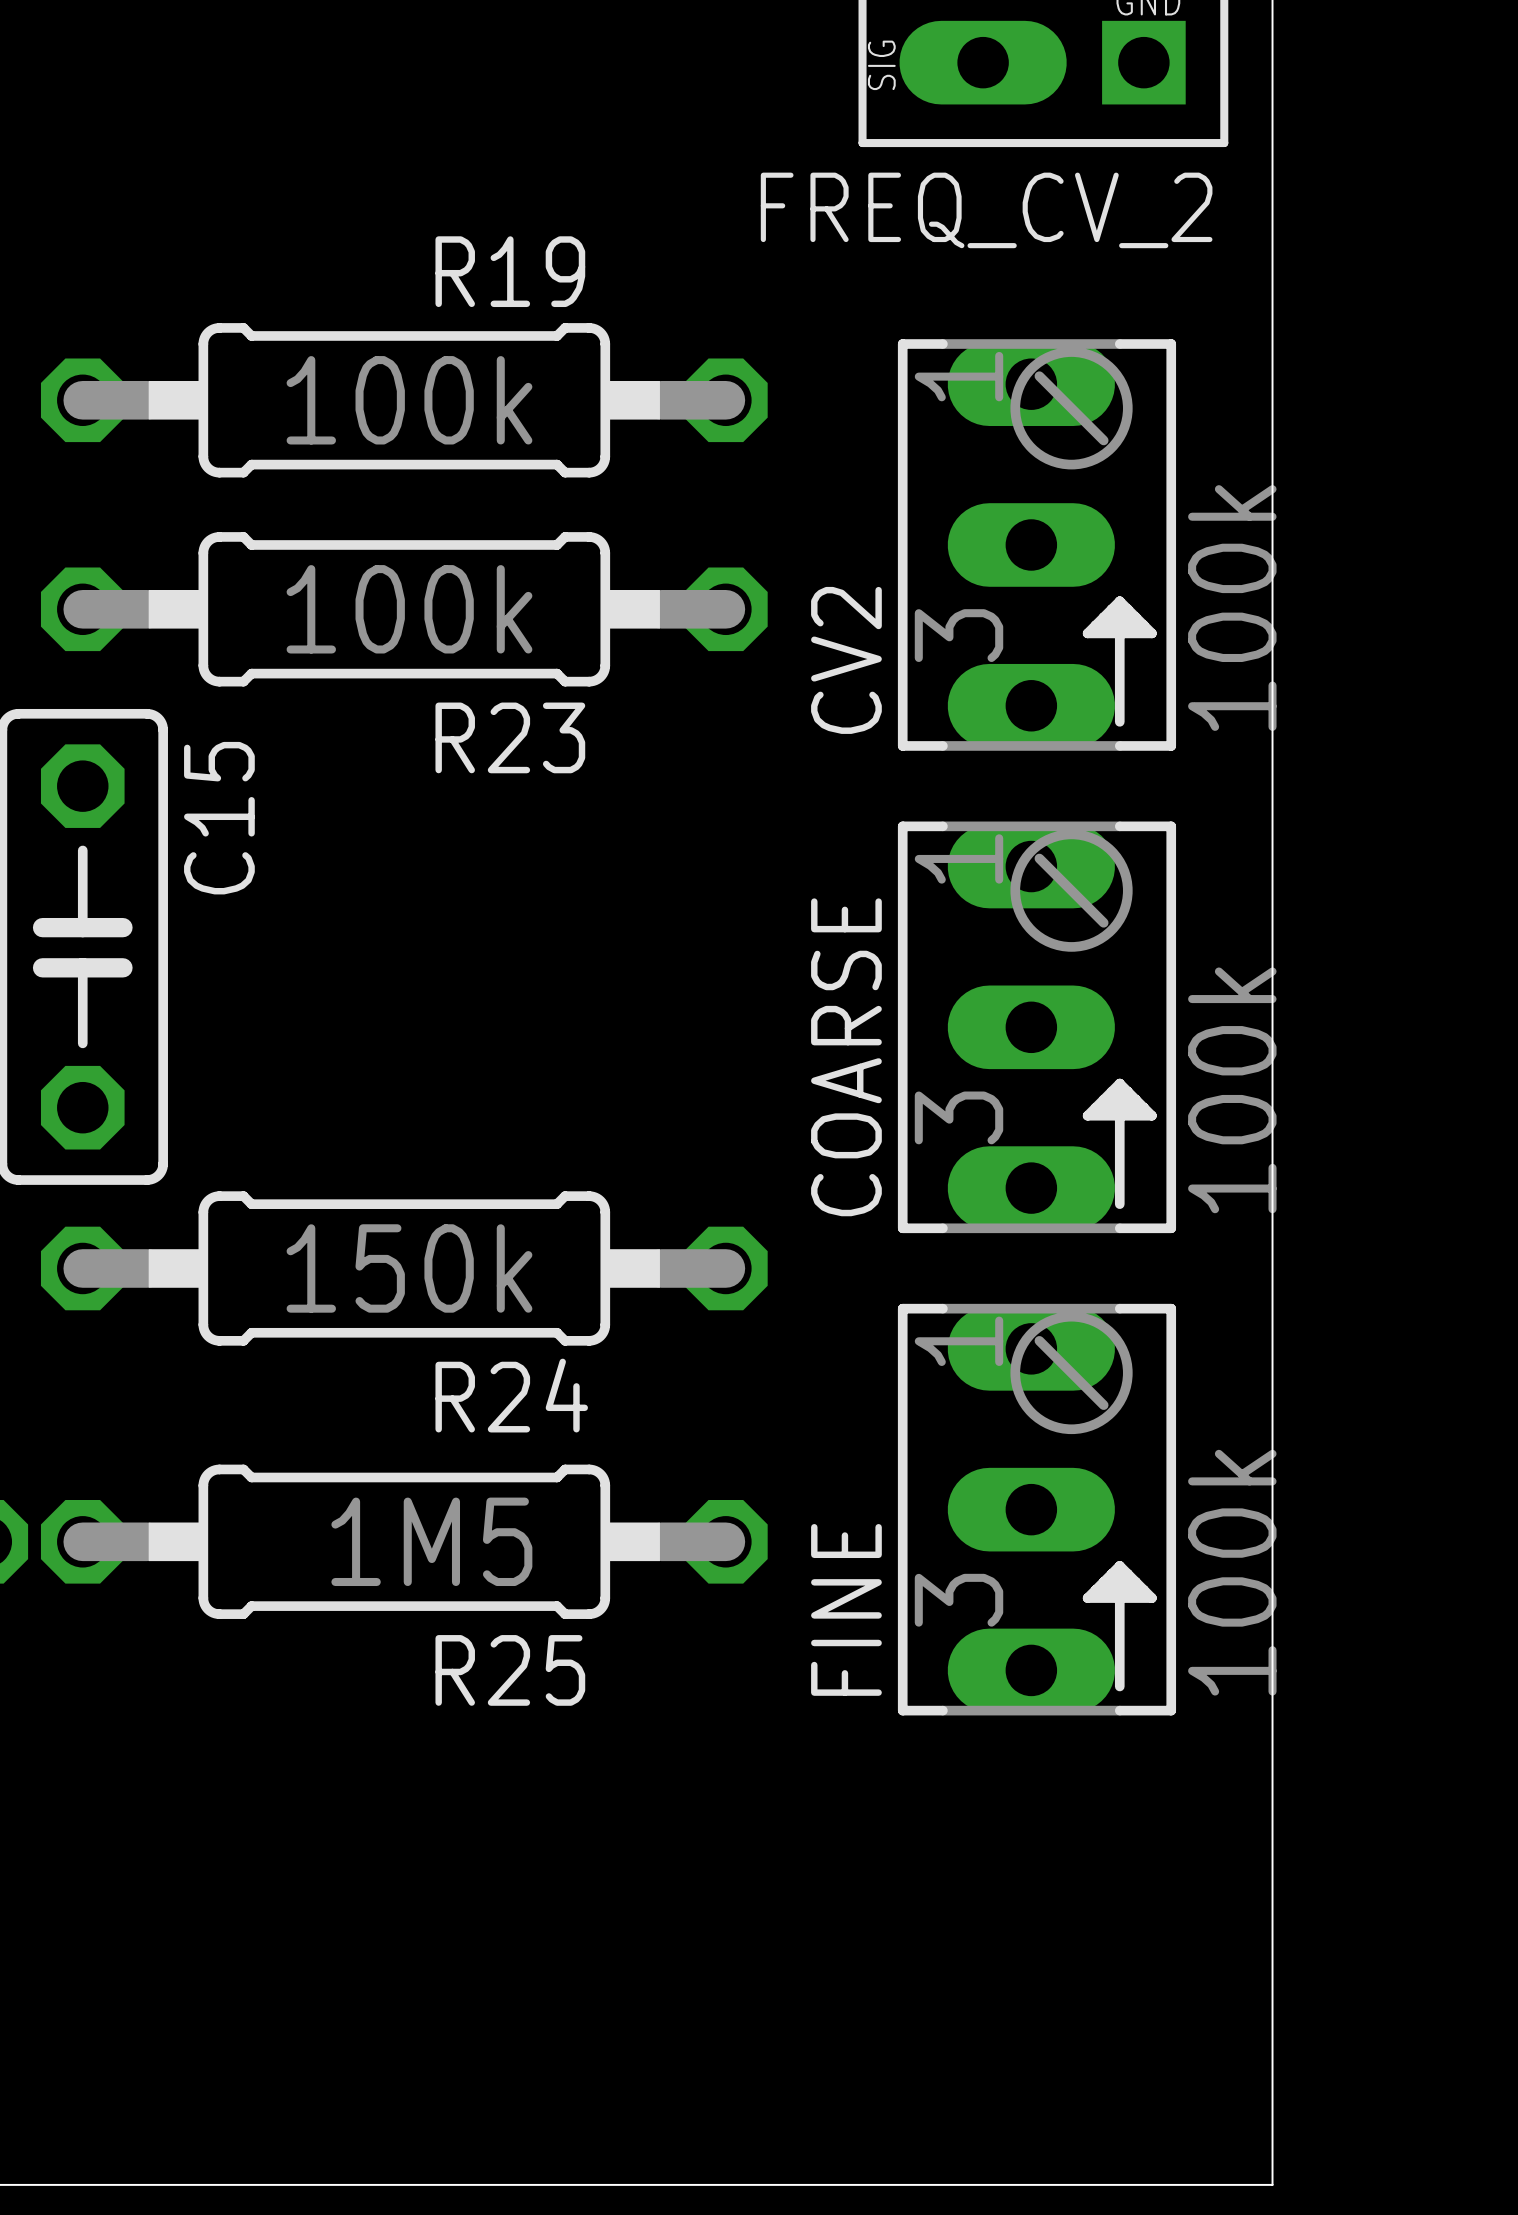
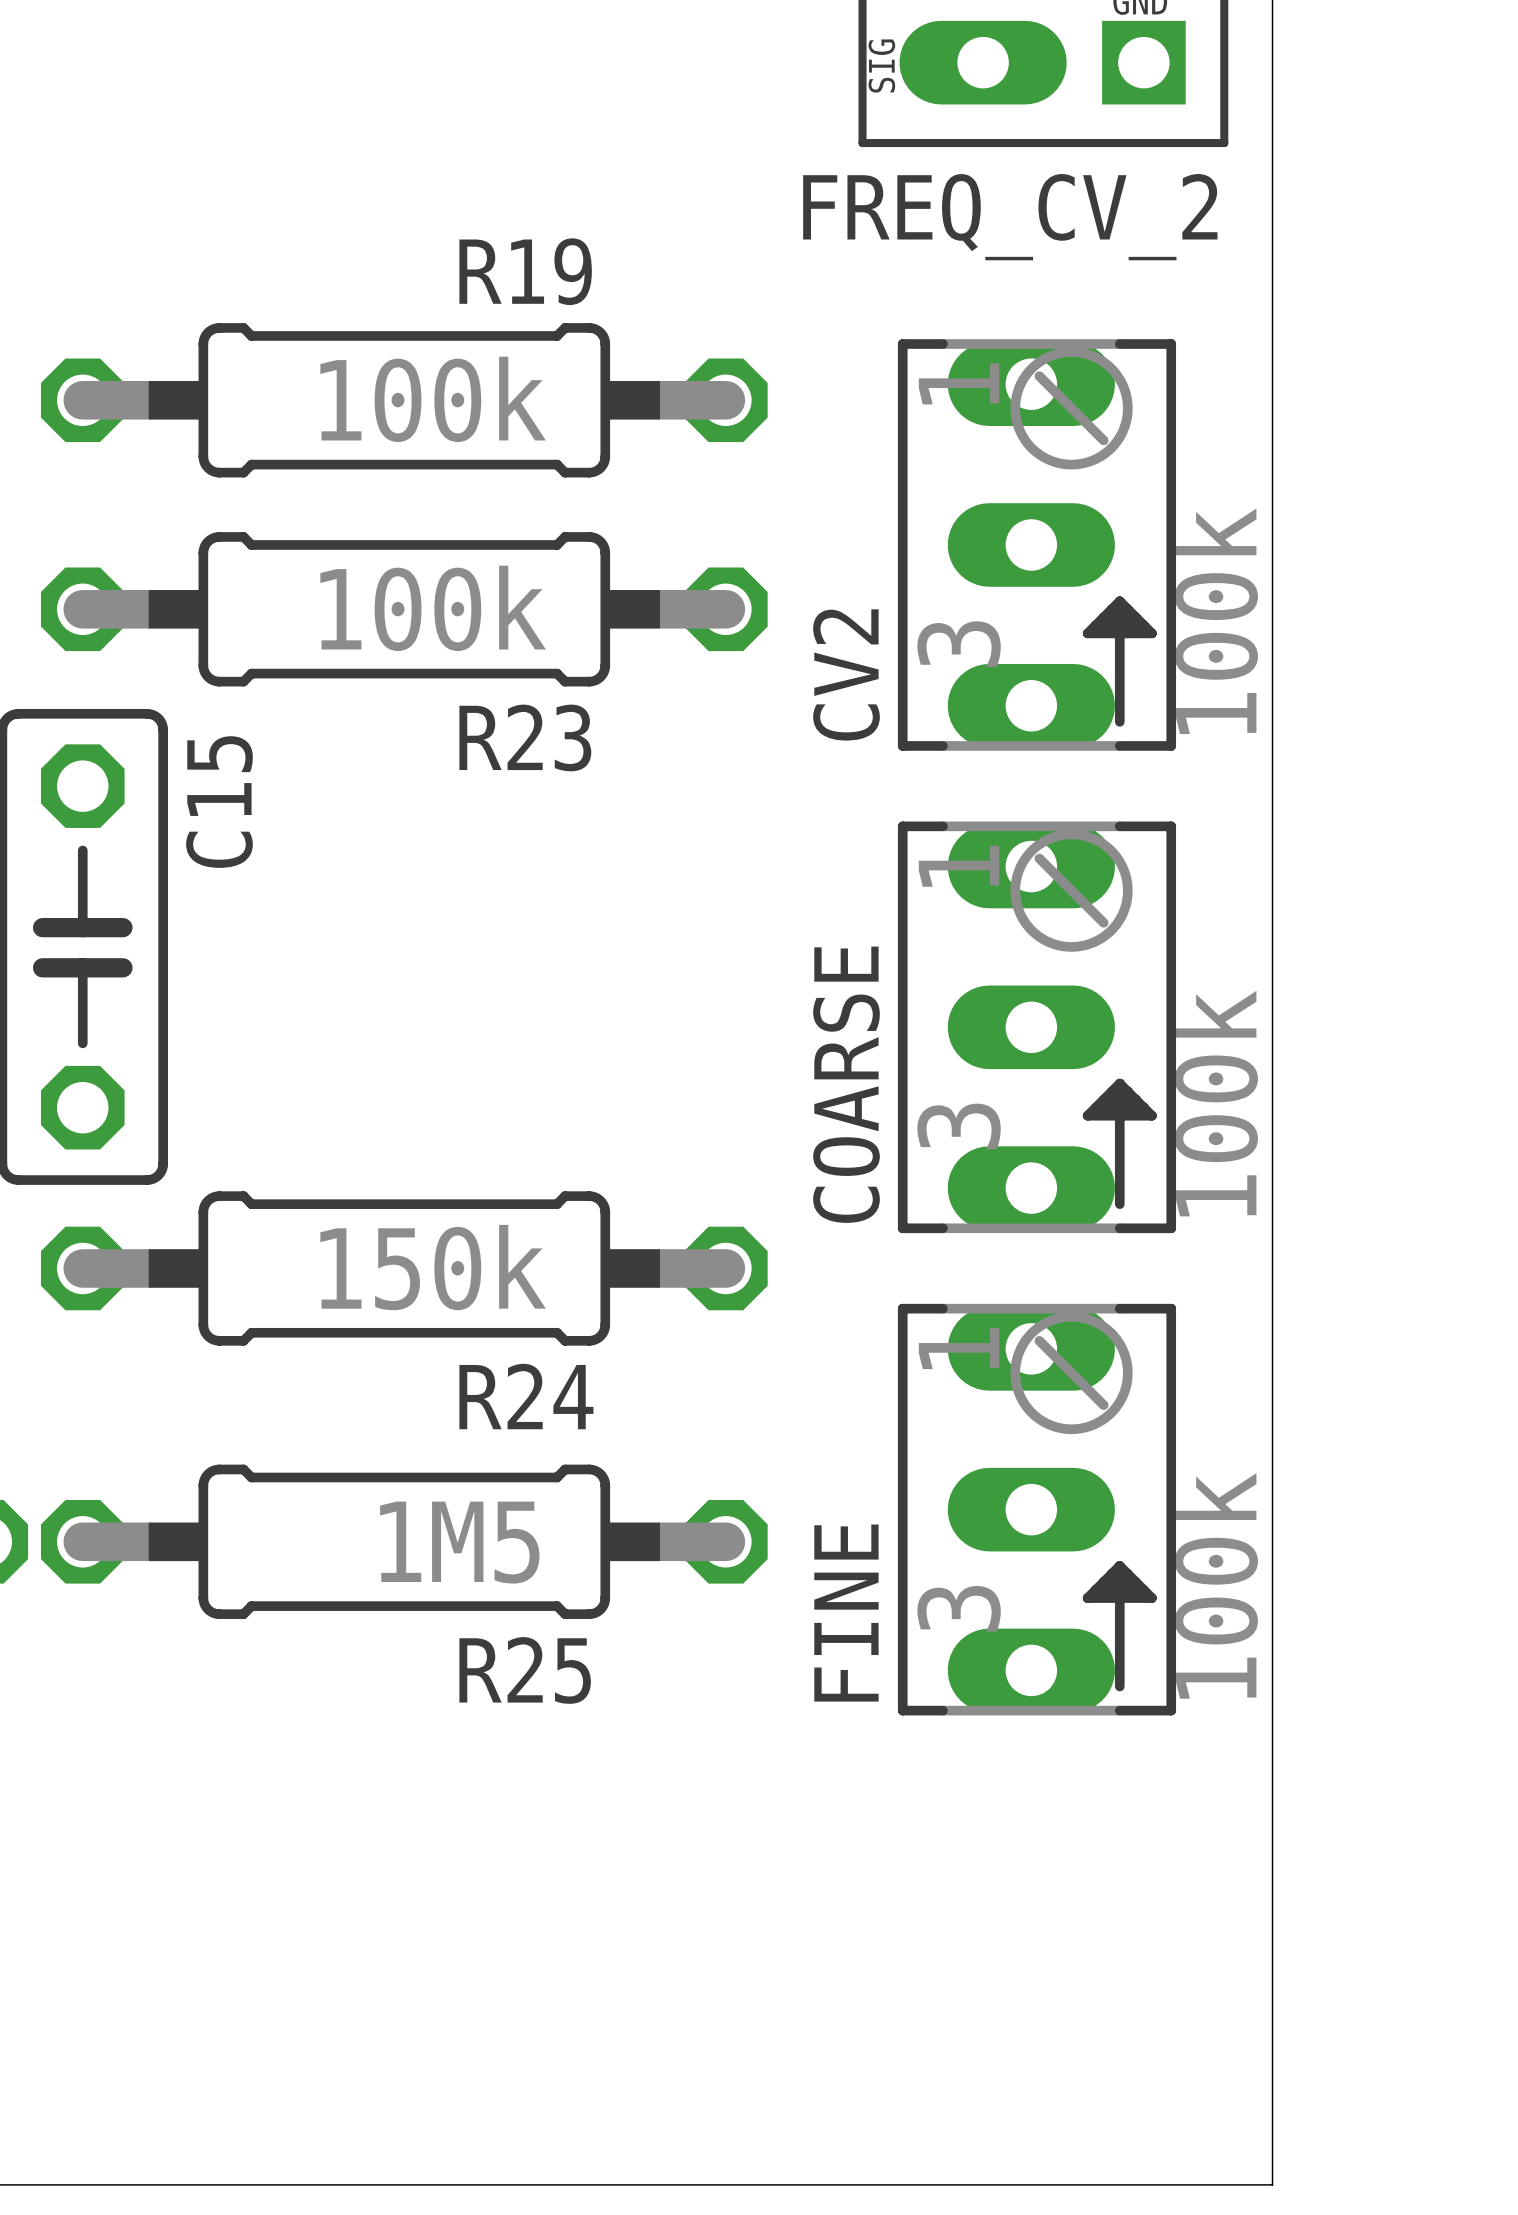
CV2 value position: 100k (1232, 608) -> 100k (1215, 621)
COARSE value position: 100k (1232, 1090) -> 100k (1215, 1103)
FINE value position: 100k (1232, 1572) -> 100k (1215, 1585)

